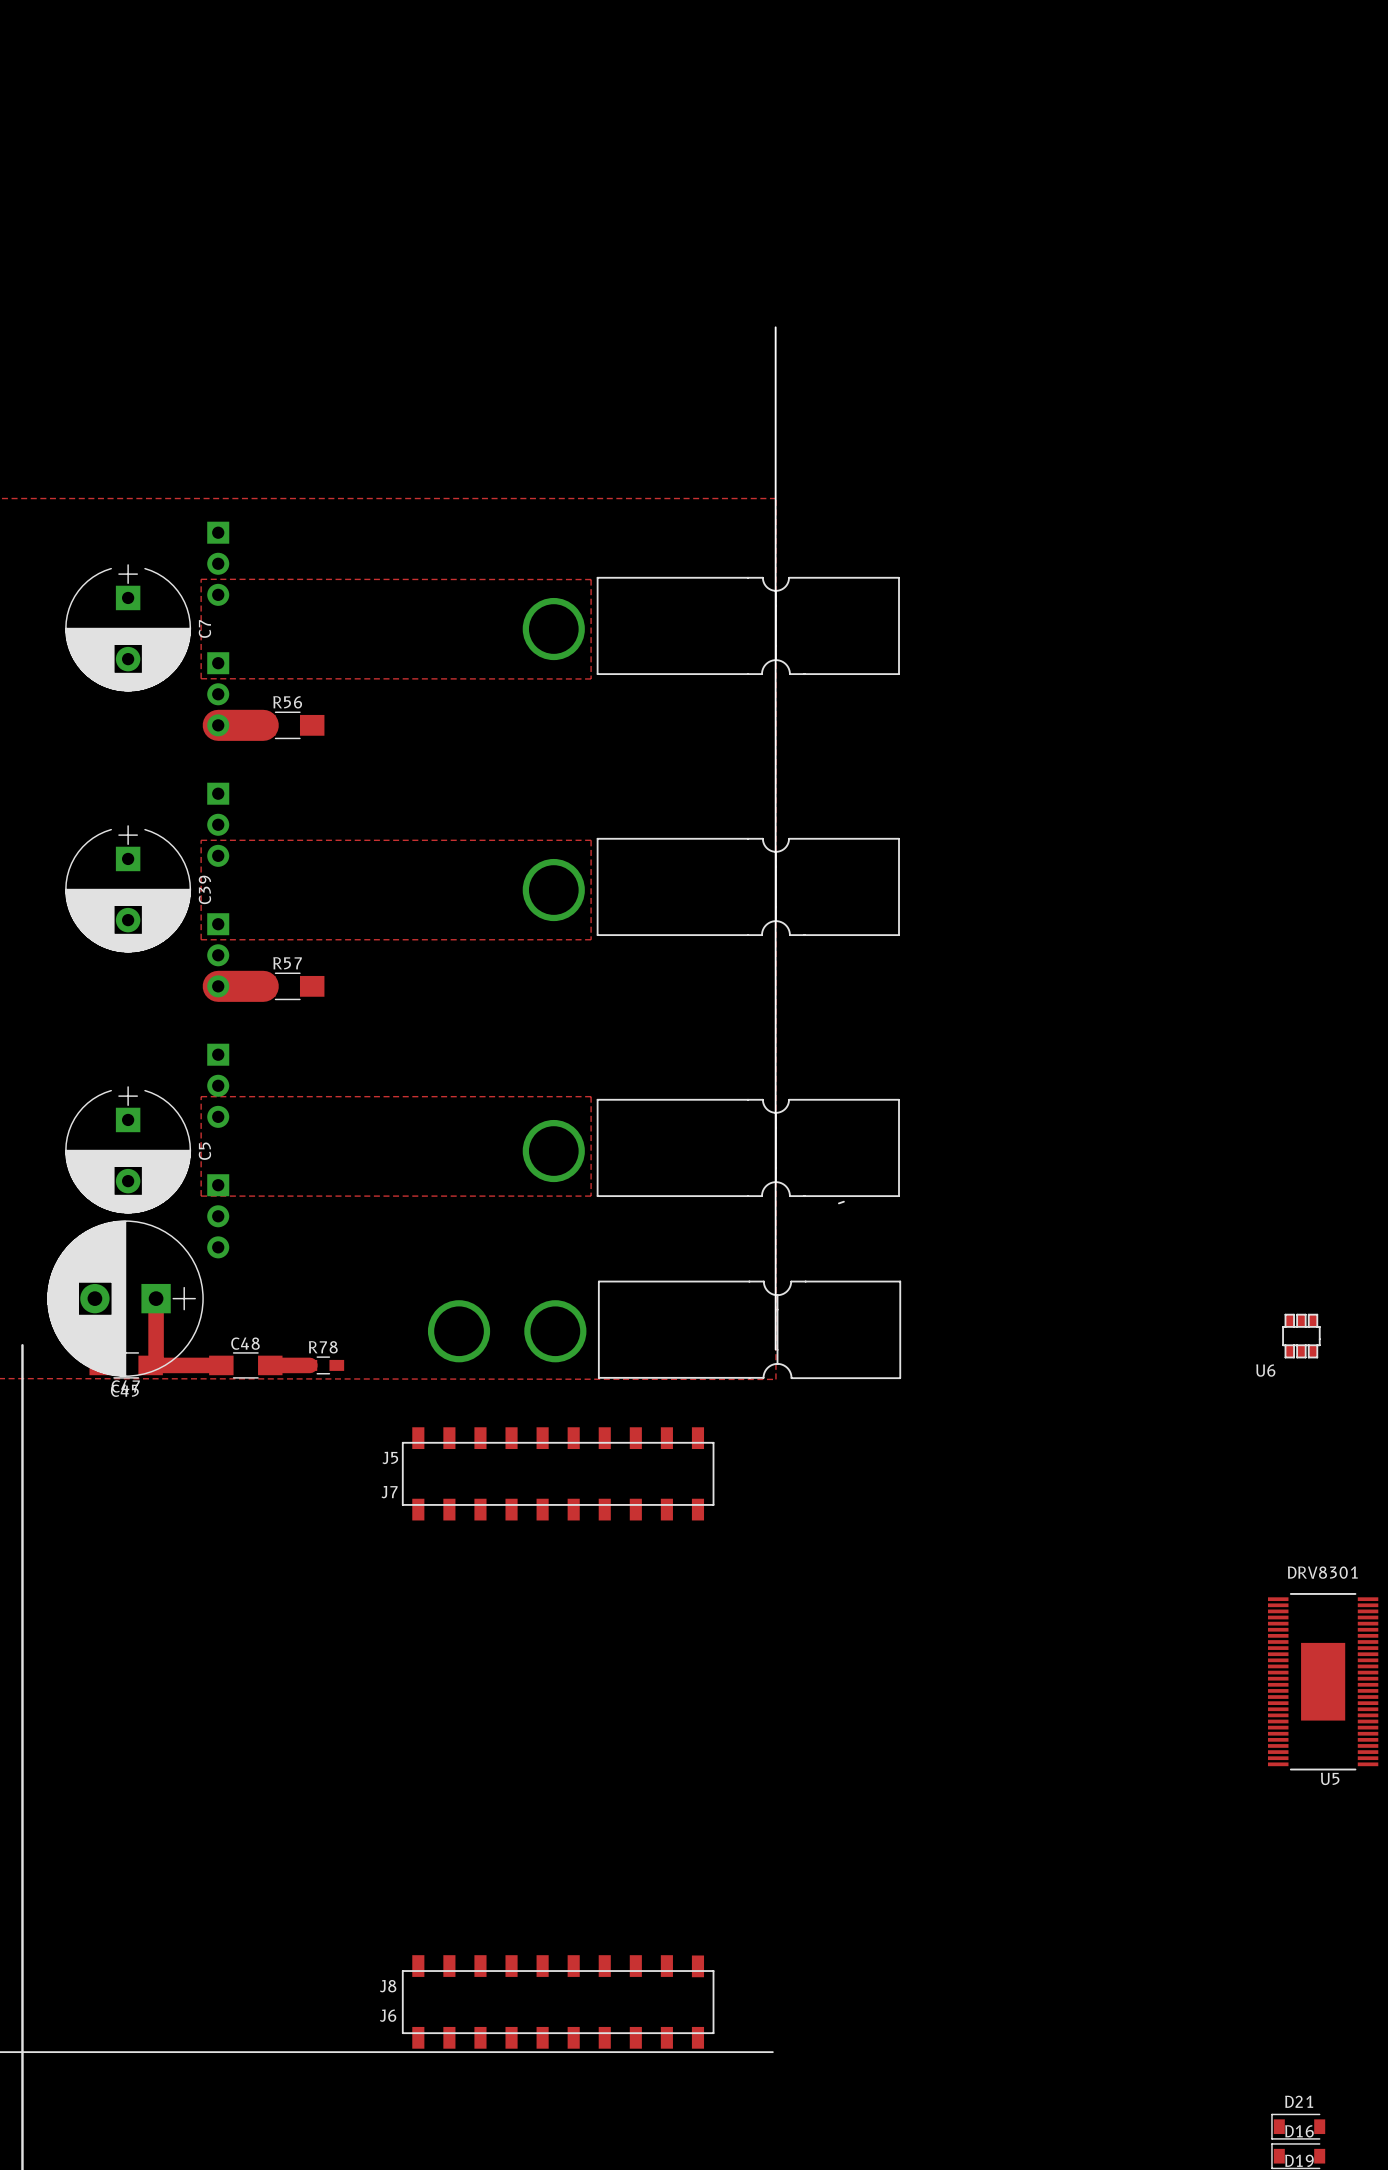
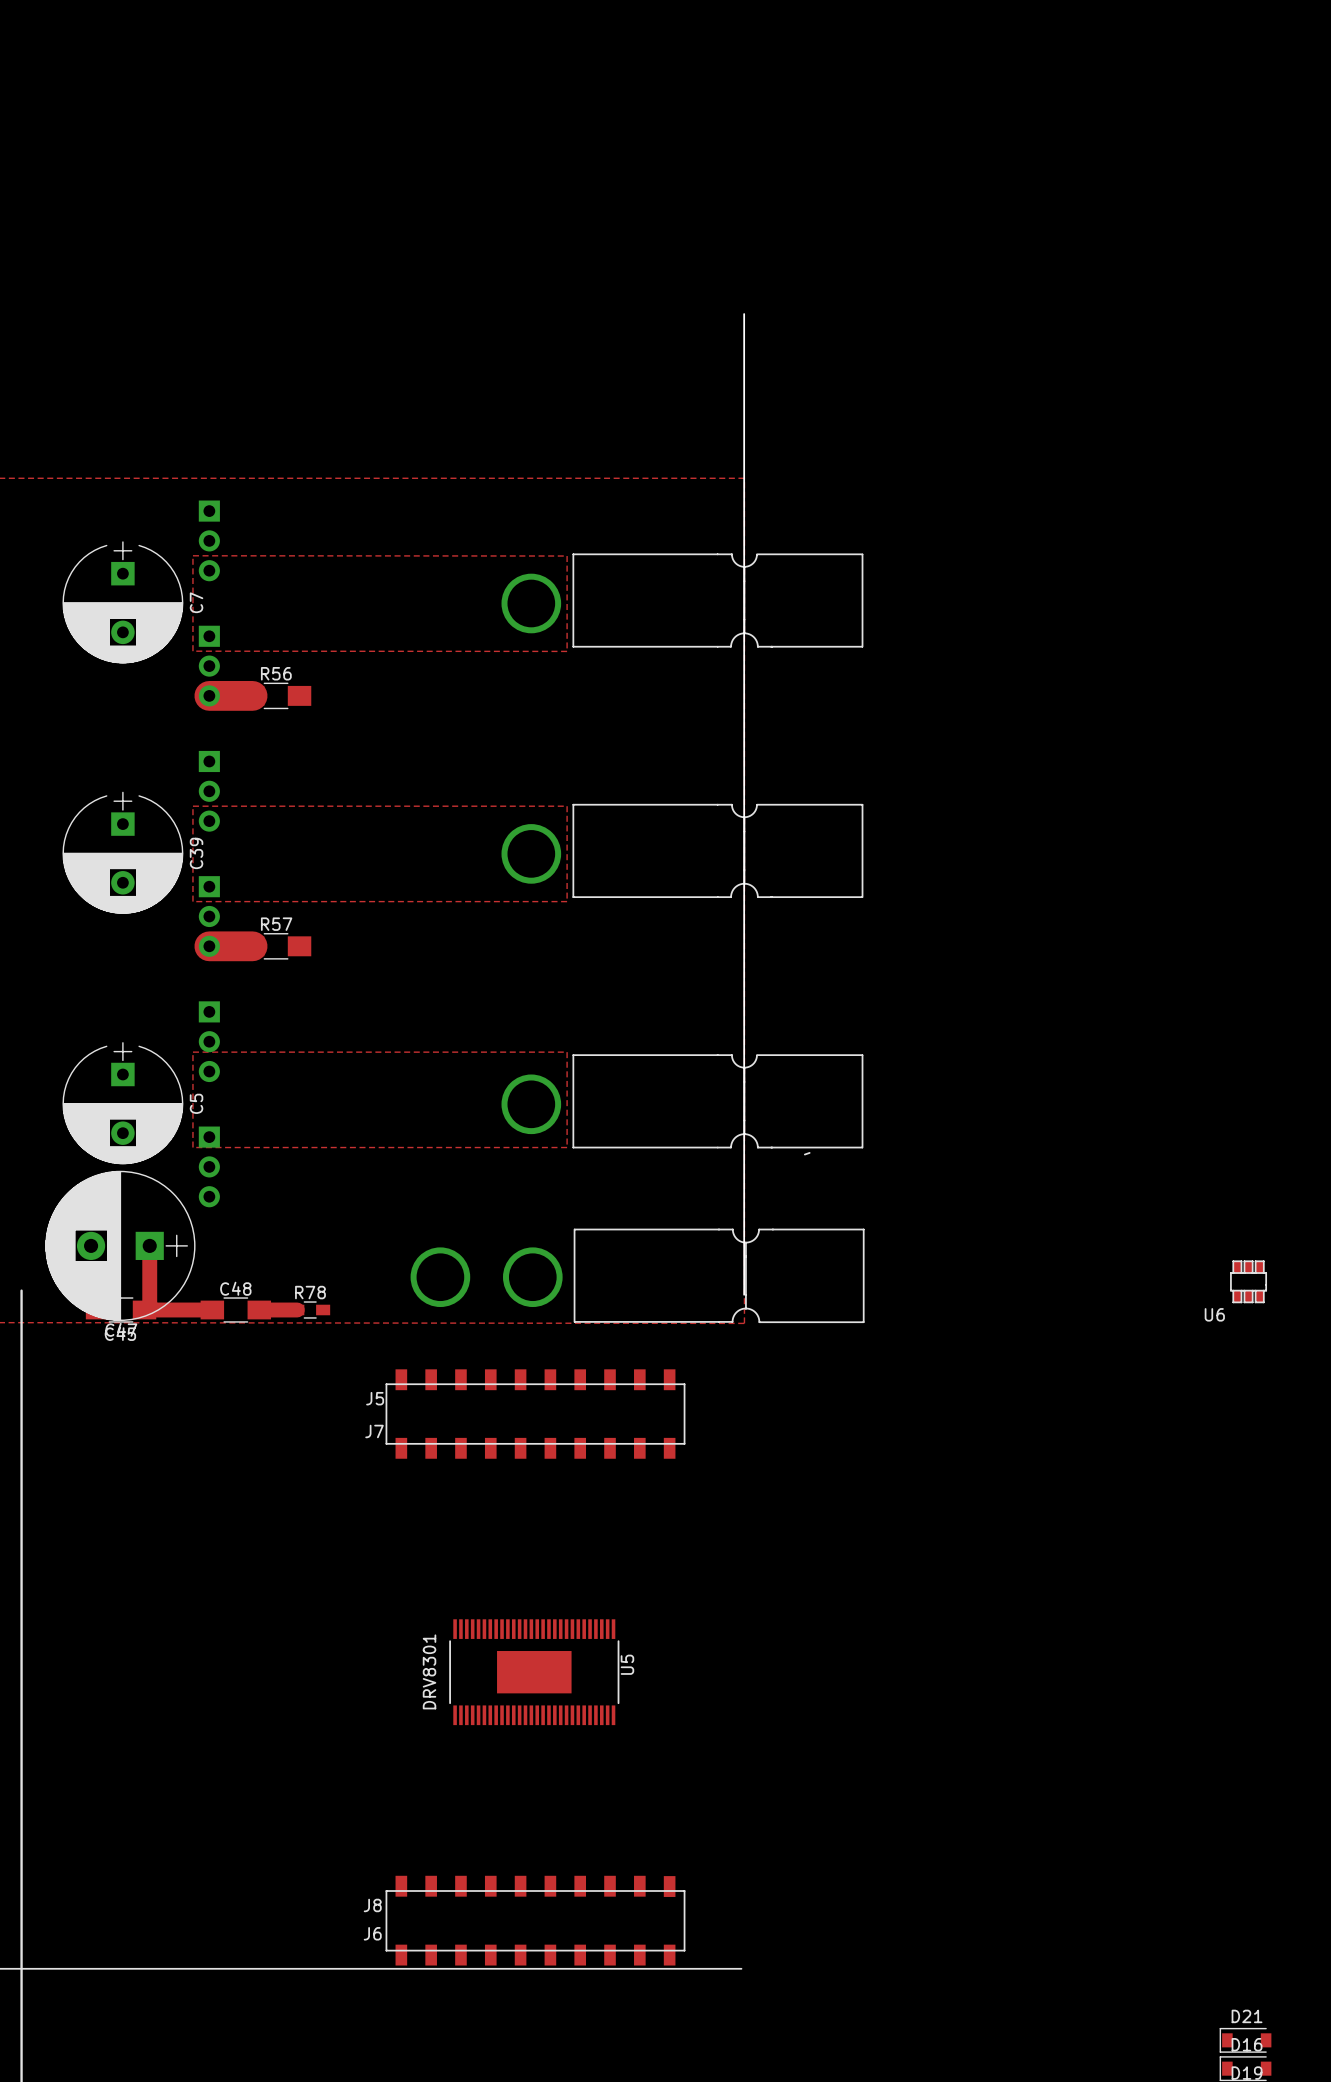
U5 value position: DRV8301 (1322, 1572) -> DRV8301 (429, 1671)
U5 rotation: 0° (1323, 1681) -> 90° clockwise (534, 1672)
U5 position: (1323, 1681) -> (534, 1672)
U5 name position: U5 (1330, 1778) -> U5 (627, 1664)

